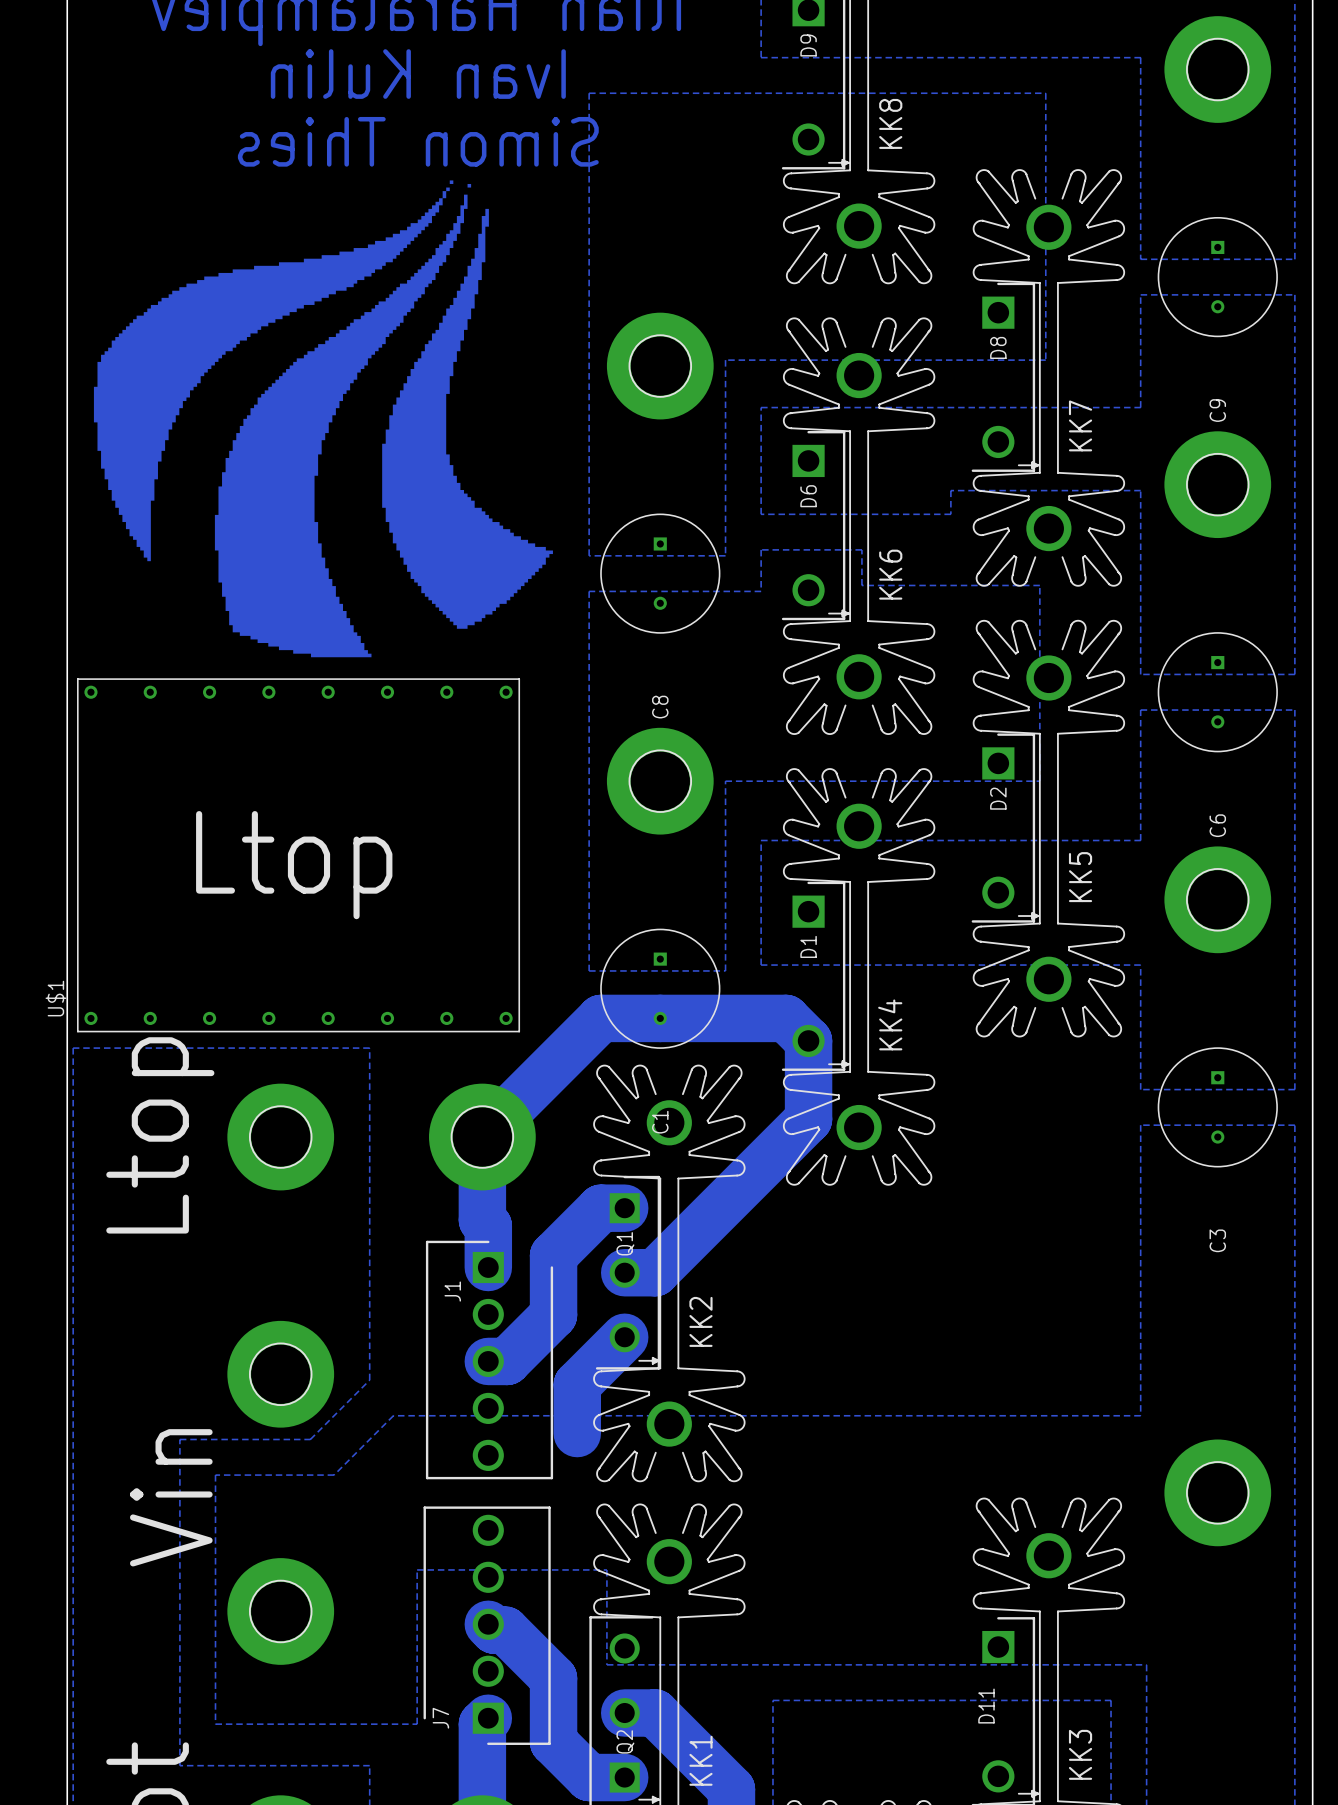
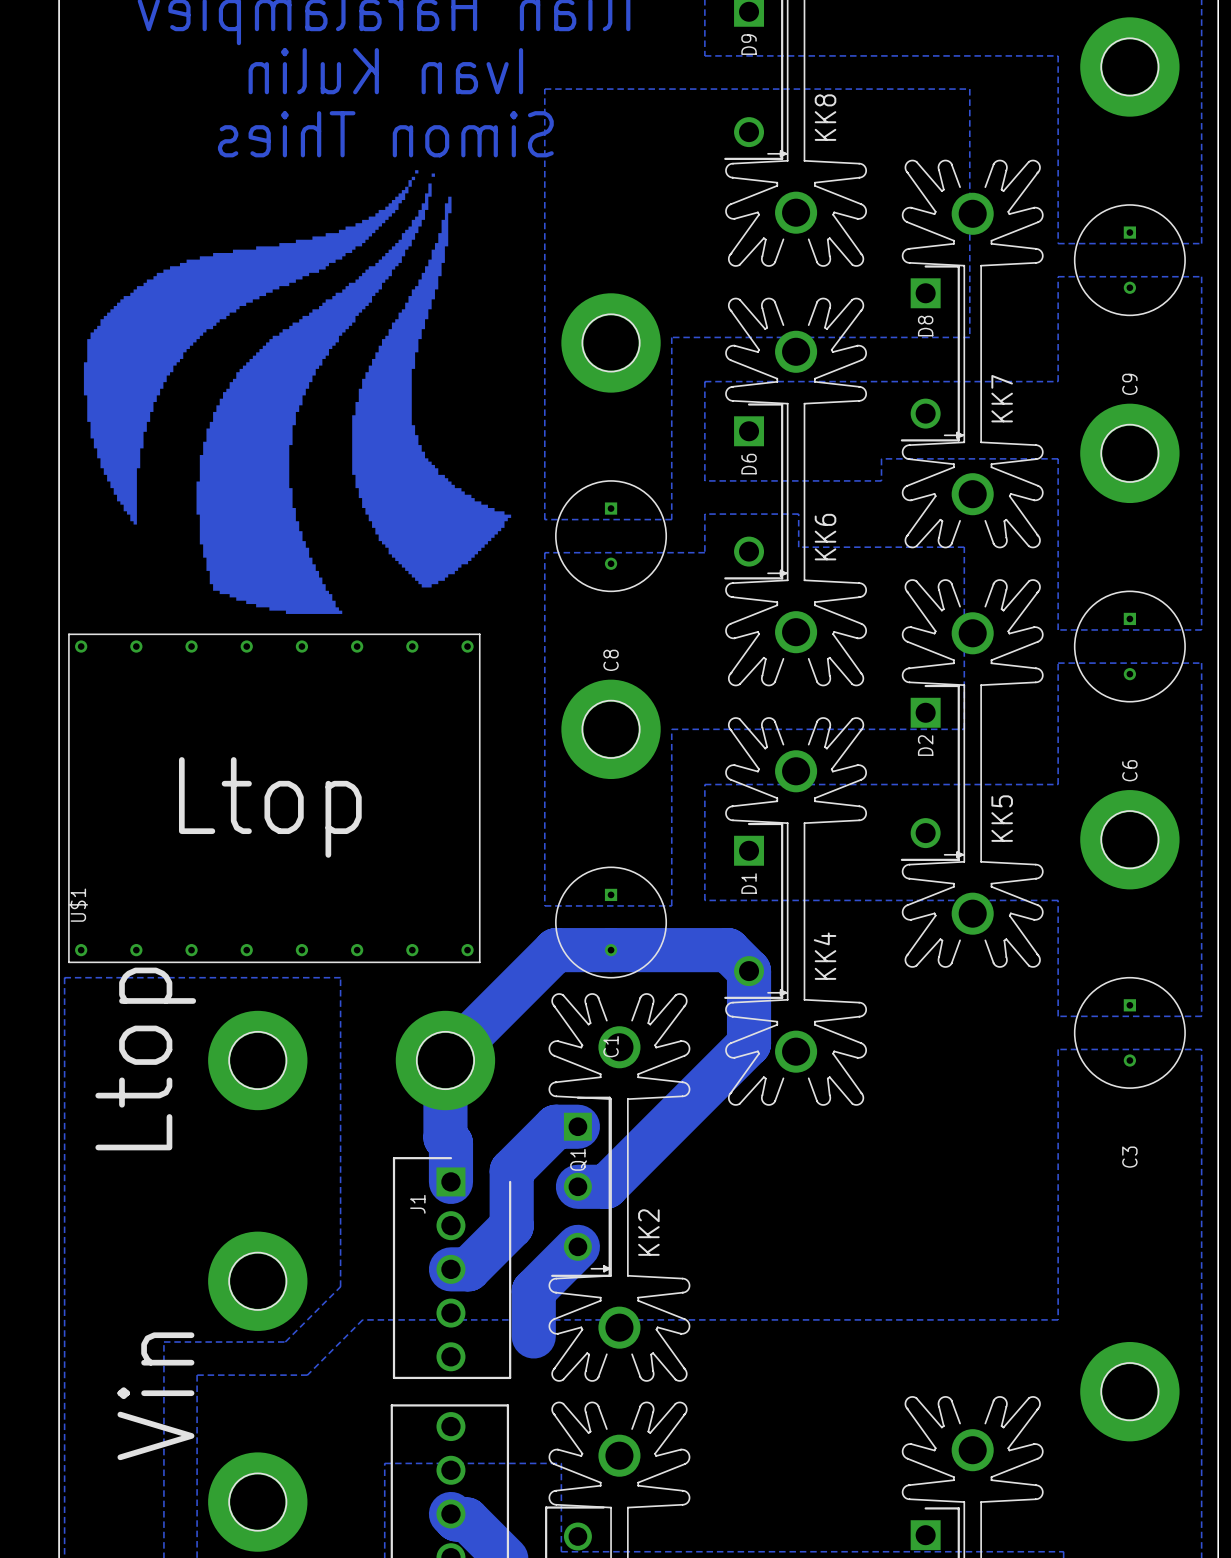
U$1 name position: U$1 (55, 998) -> U$1 (78, 905)

